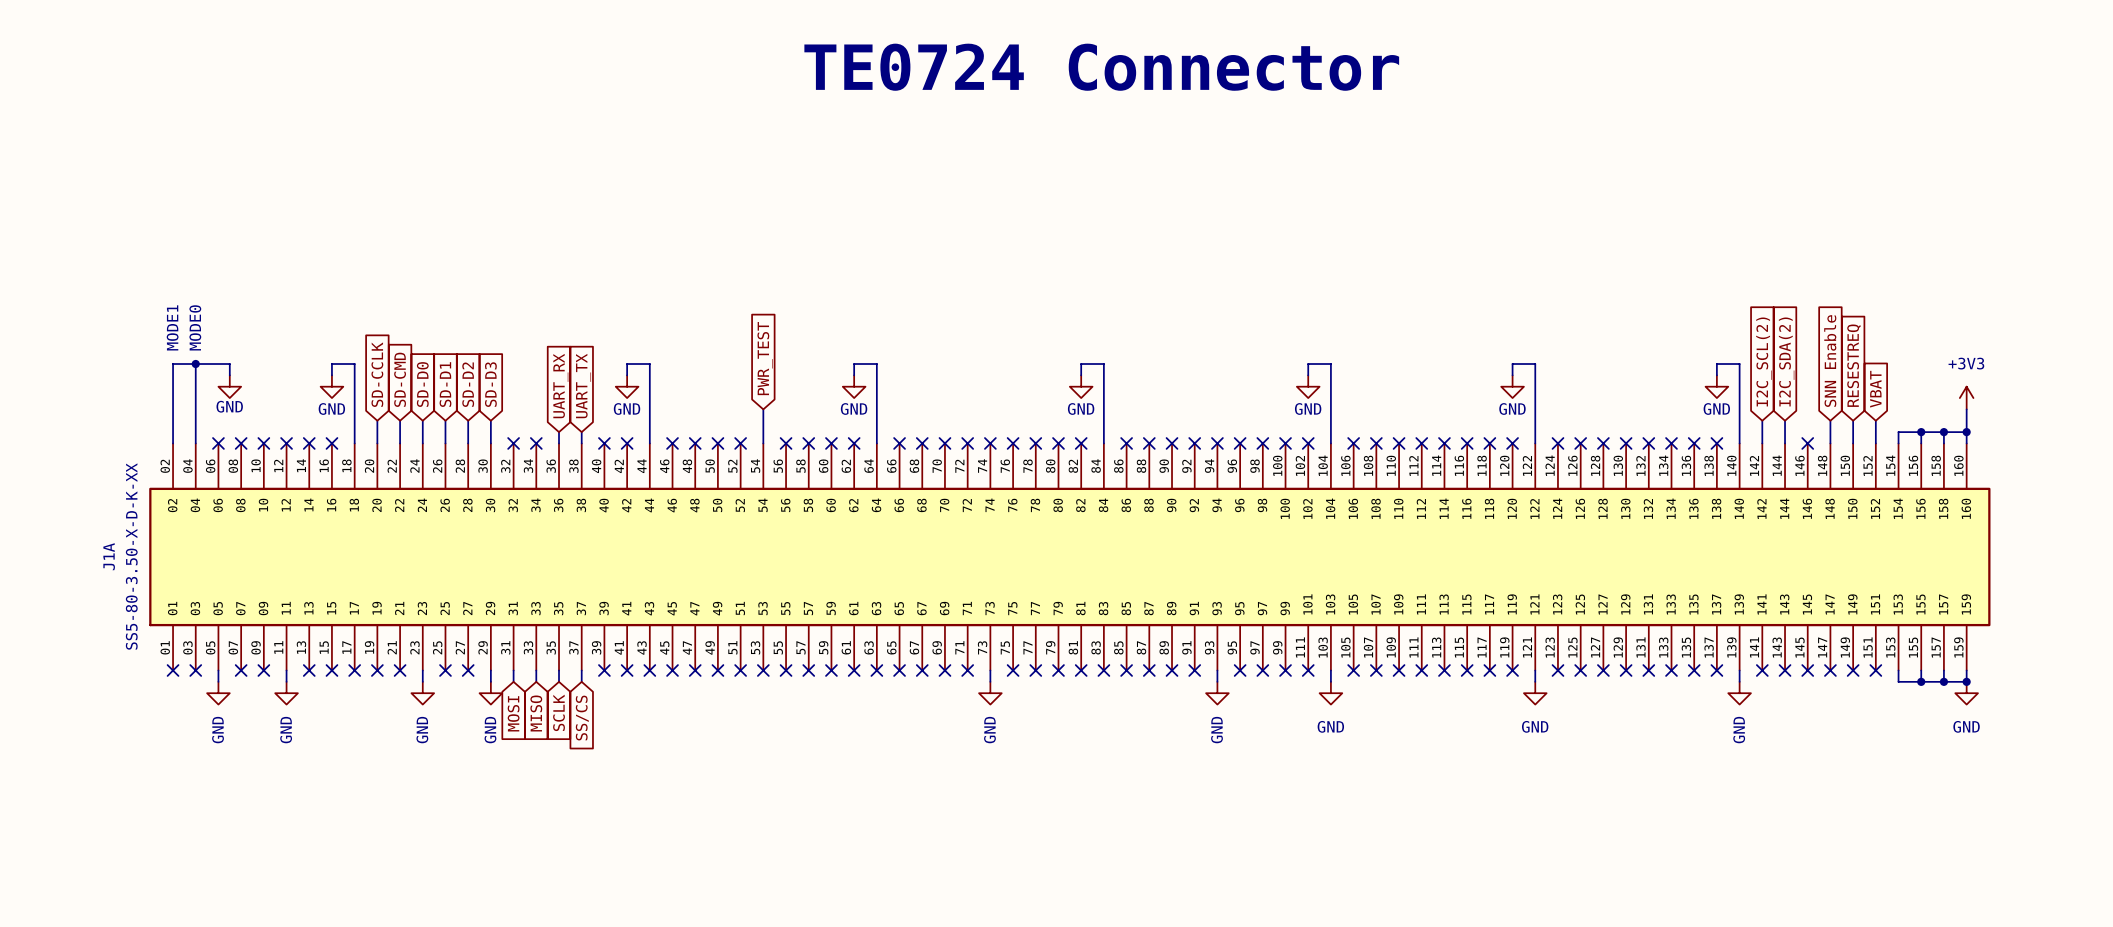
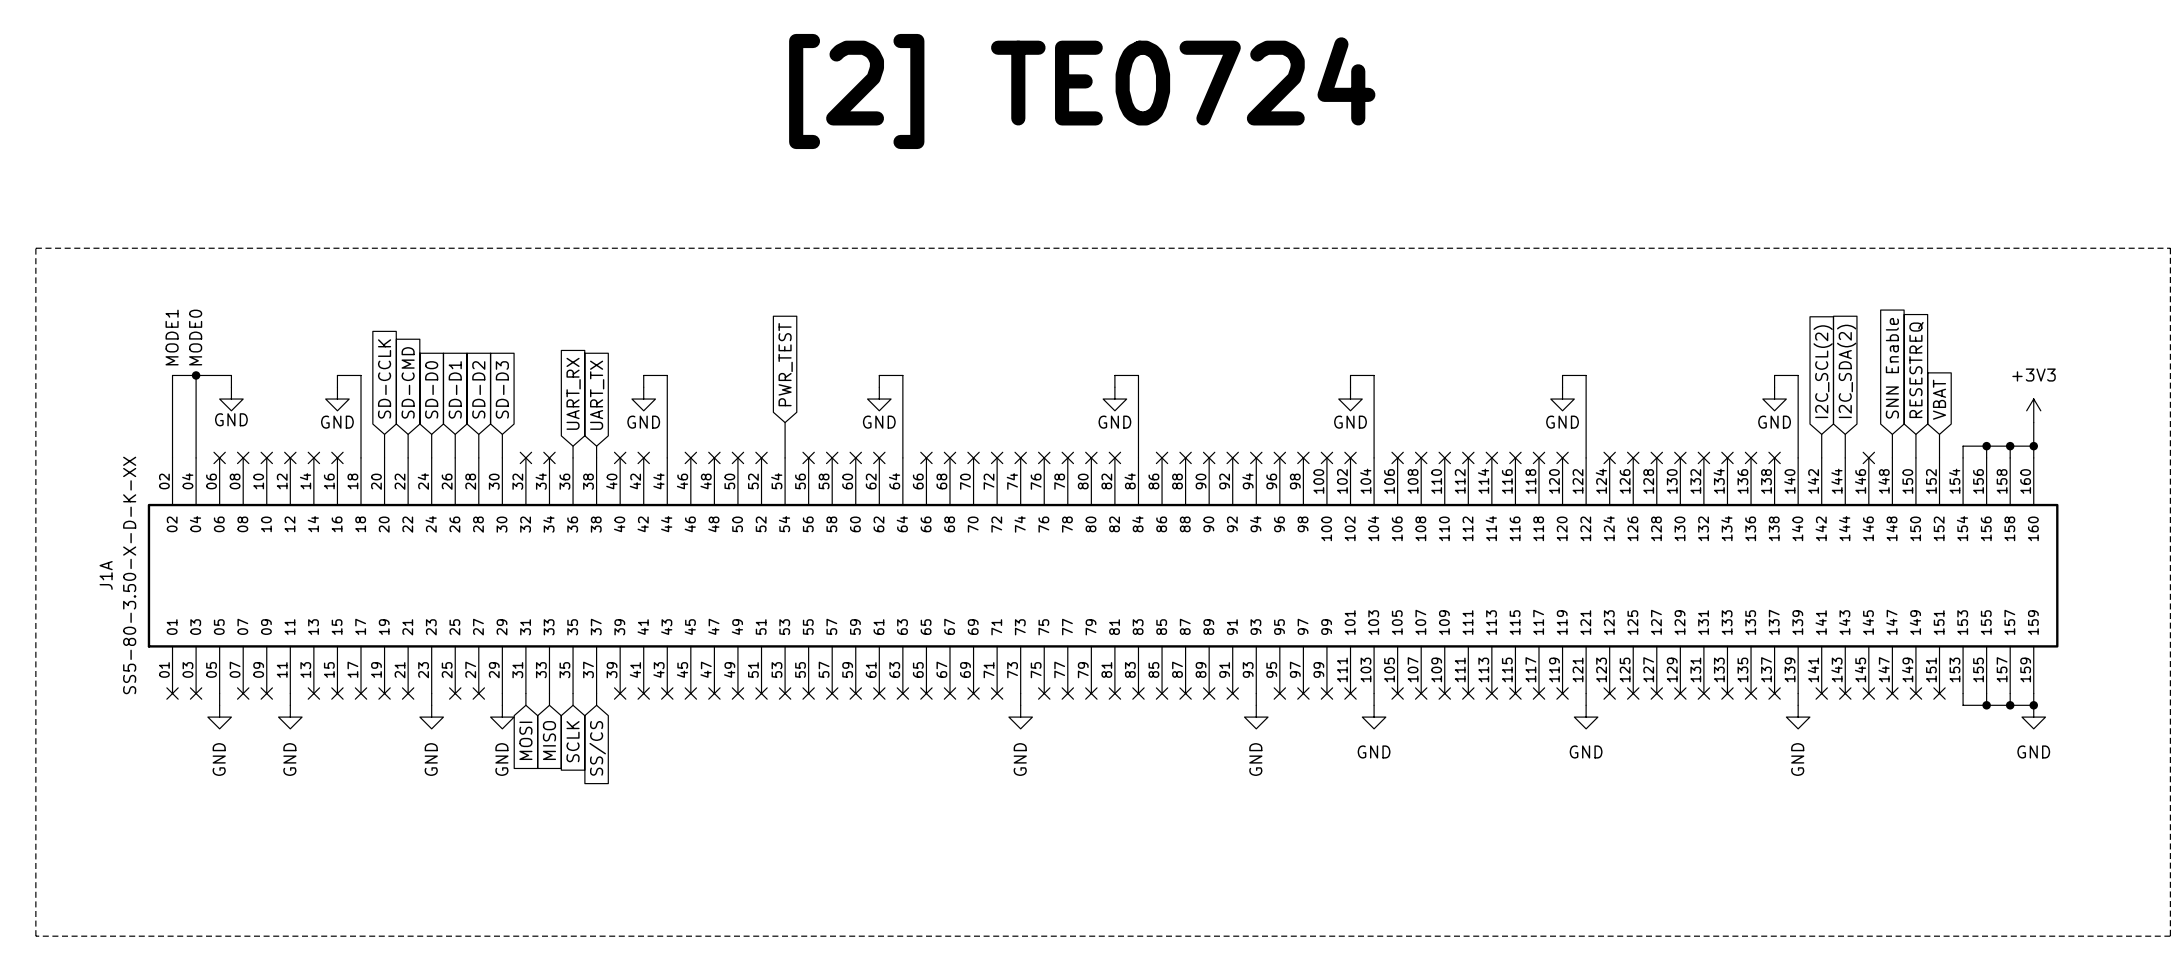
text: TE0724 Connector (1101, 67) -> none
text: none -> [2] TE0724 (1082, 91)
line: none -> (35, 248) (2170, 248) (2170, 936) (35, 936) (35, 248)

